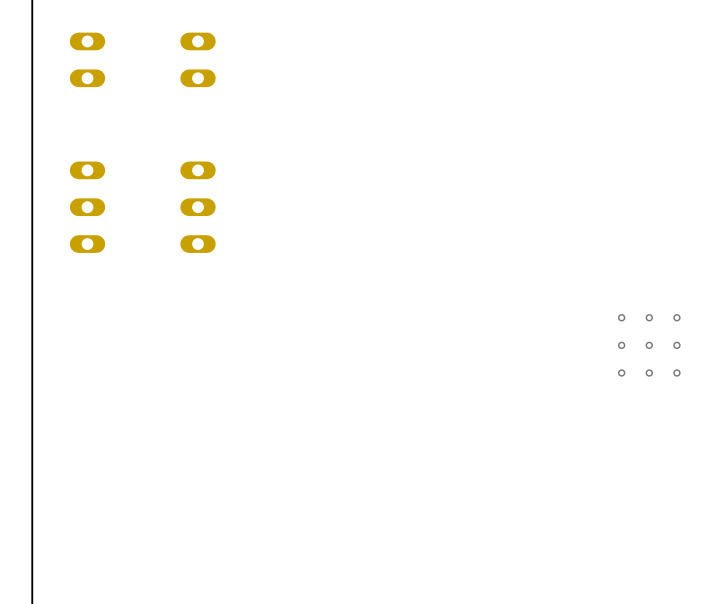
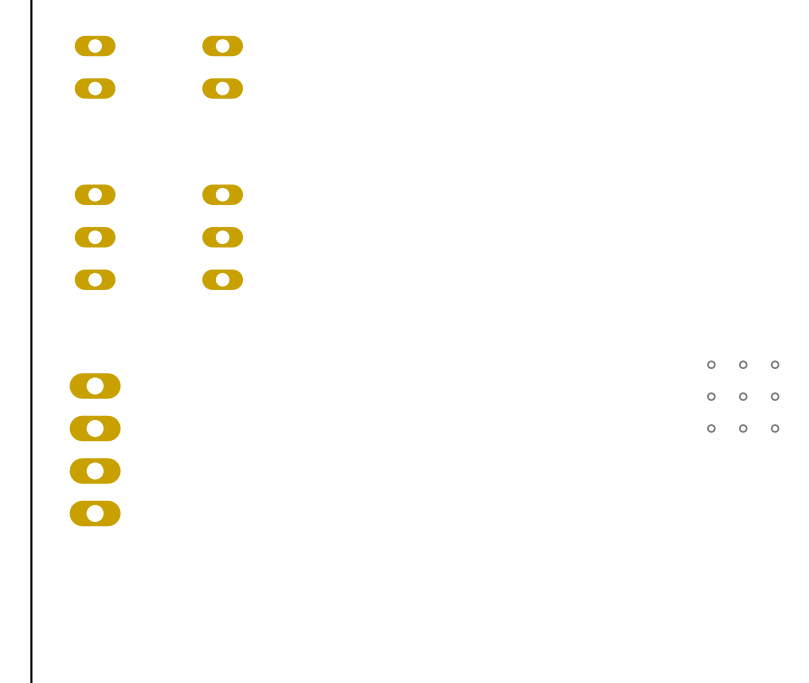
part: none -> (95, 449)

